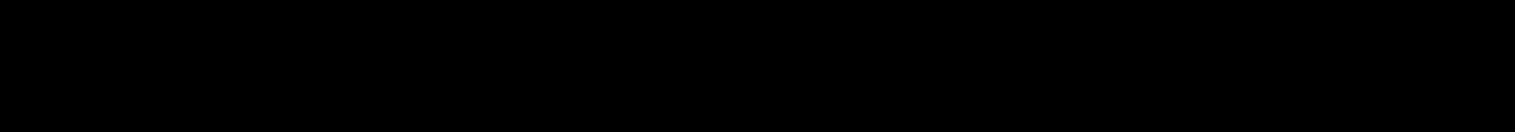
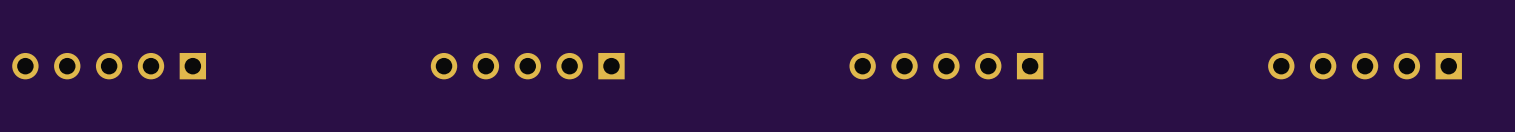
part: none -> (109, 66)
part: none -> (527, 66)
part: none -> (946, 66)
part: none -> (1365, 66)

